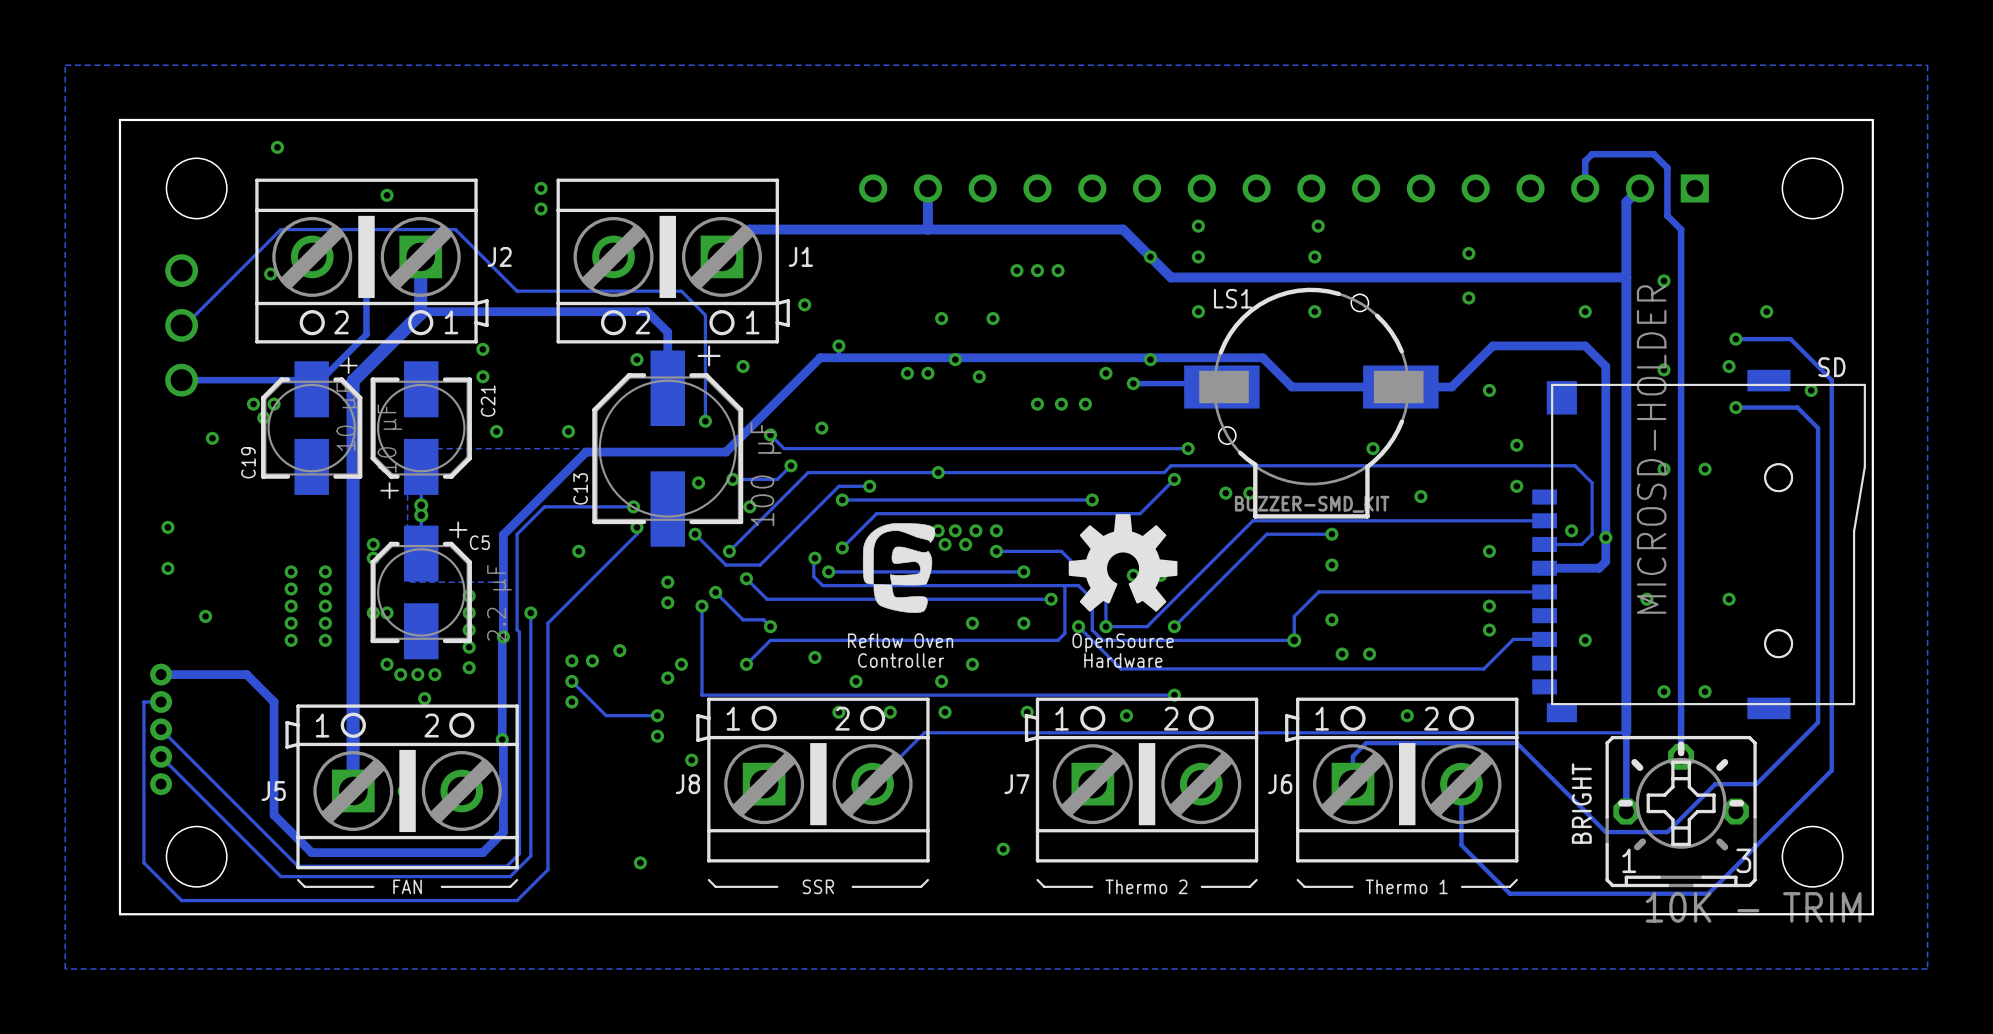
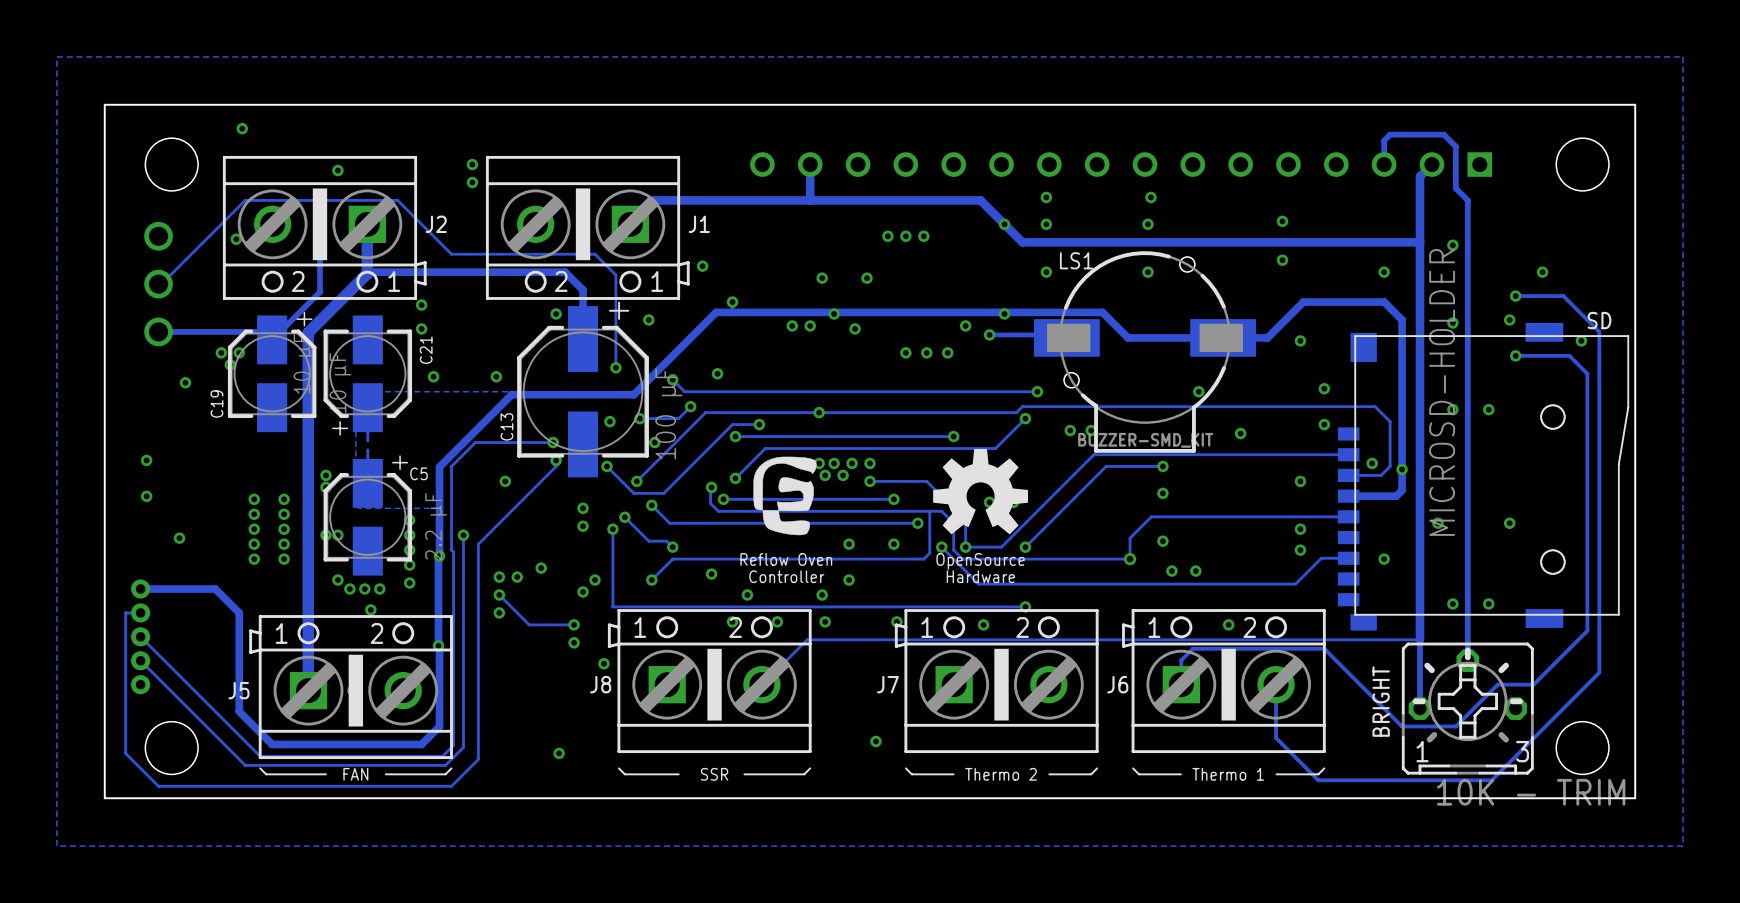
via: (421, 505) -> none
via: (421, 515) -> none

